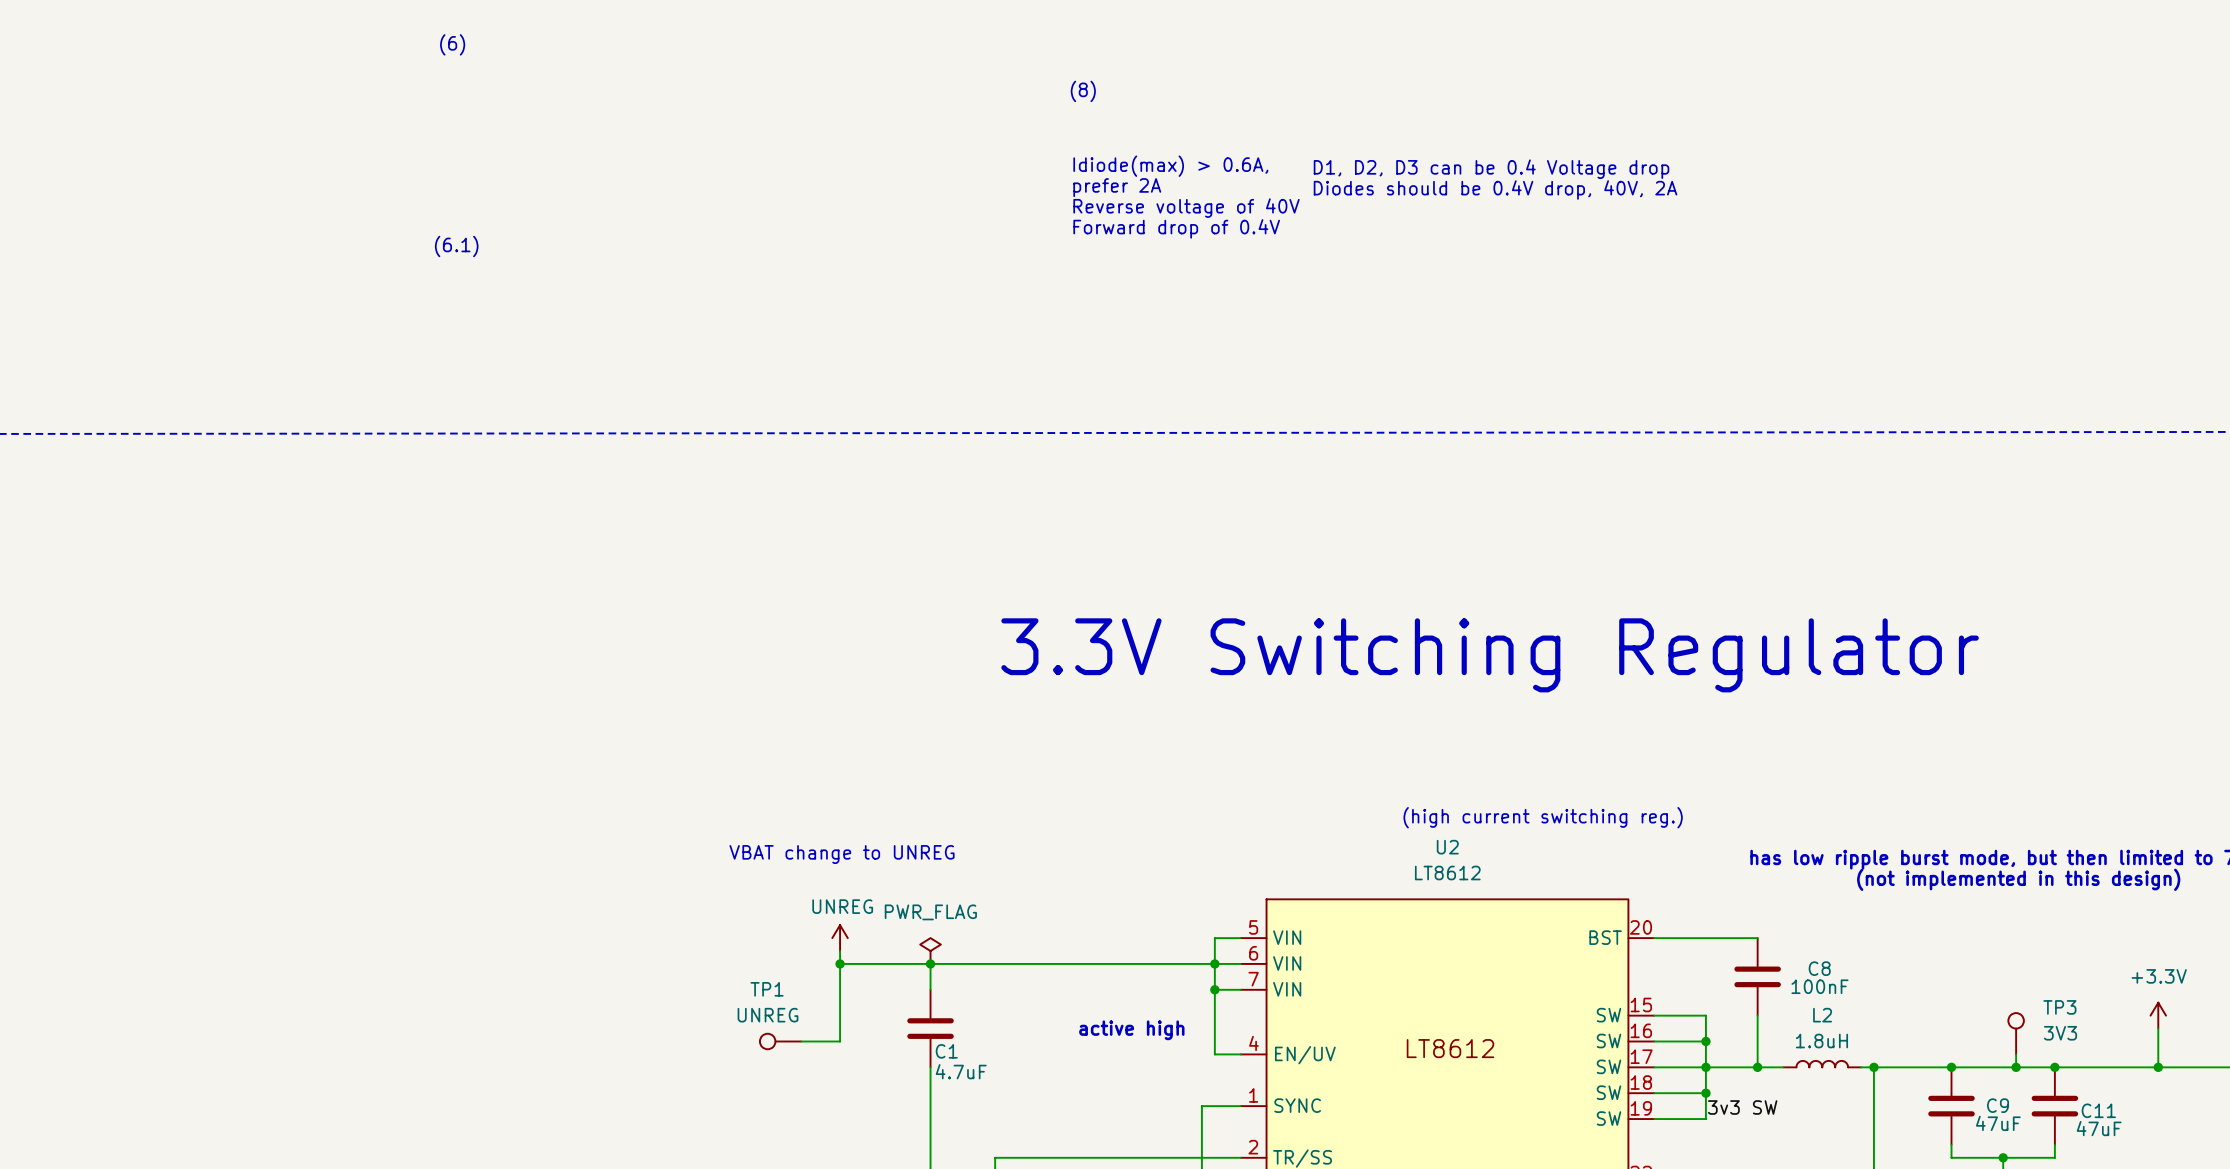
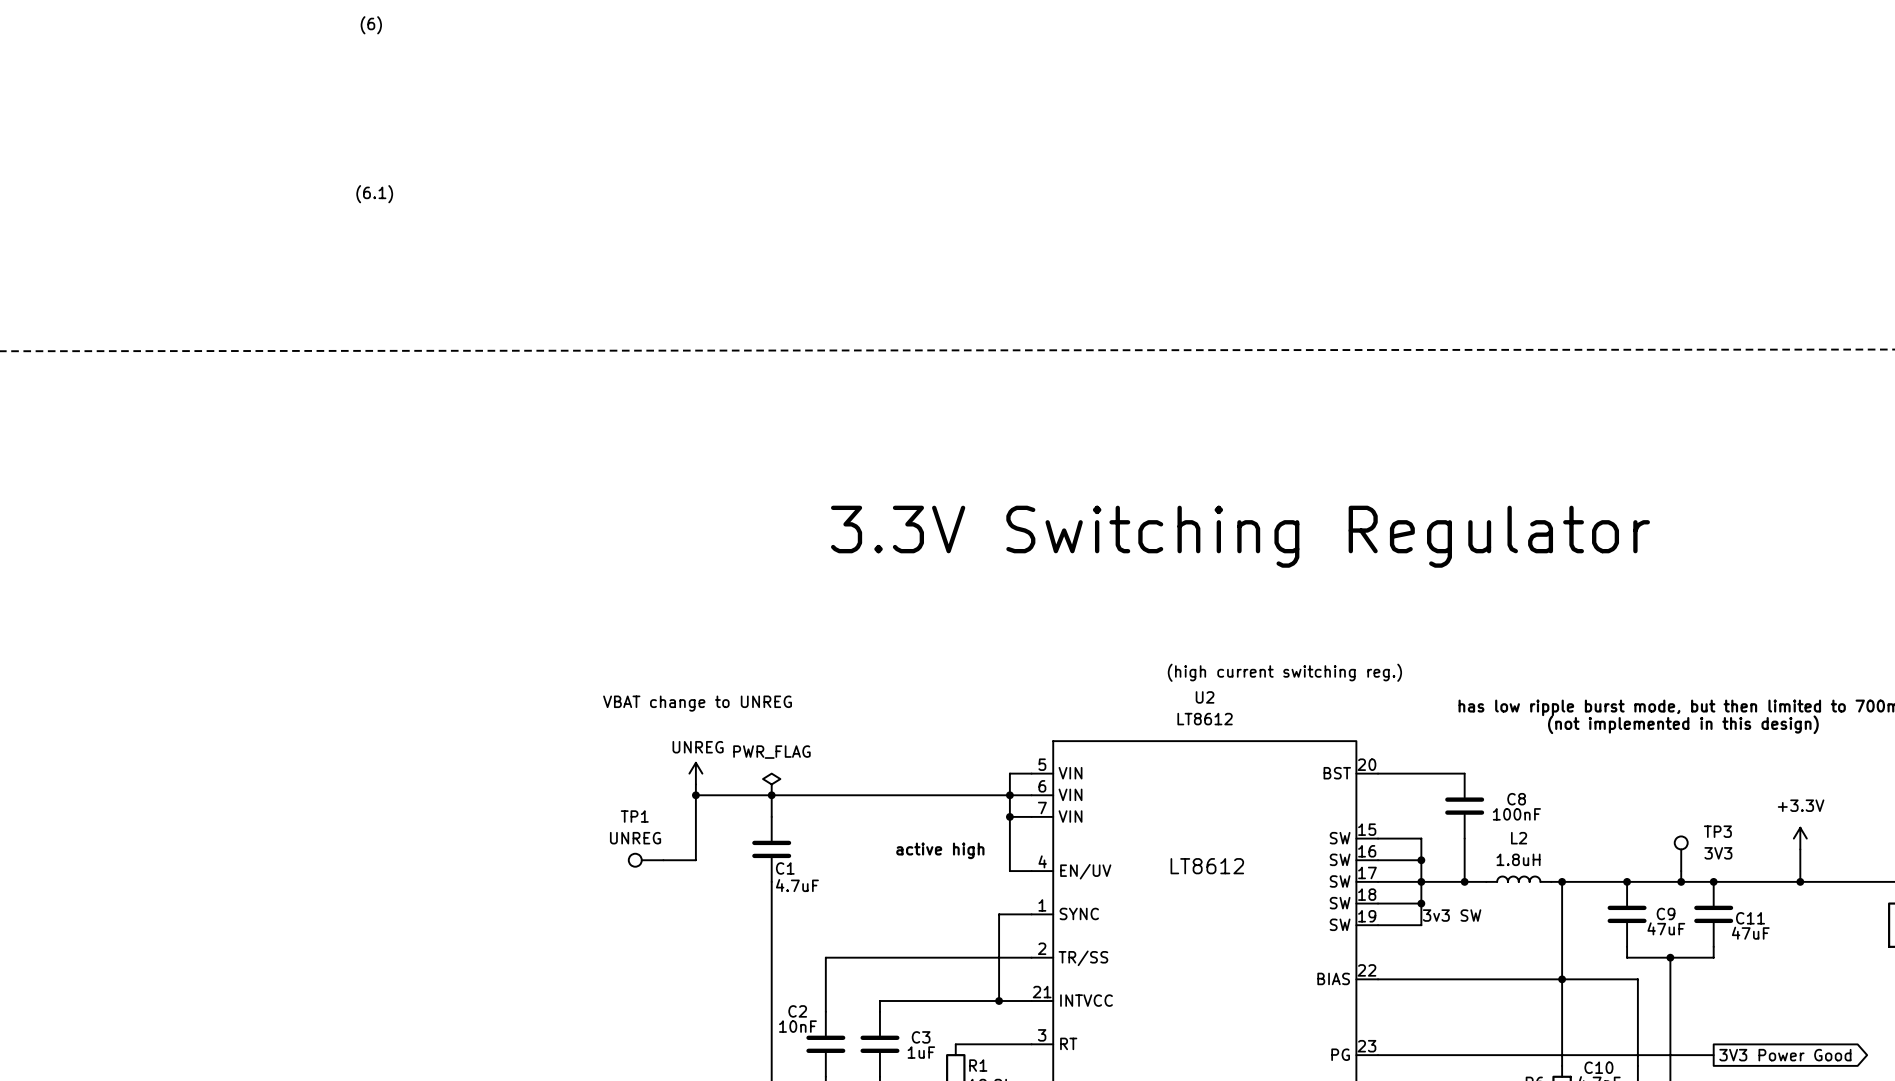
text: (8) (1083, 91) -> none
text: Idiode(max) > 0.6A, (1170, 166) -> none
text: D1, D2, D3 can be 0.4 Voltage drop (1491, 169) -> none
text: prefer 2A (1117, 187) -> none
text: Diodes should be 0.4V drop, 40V, 2A (1495, 190) -> none
text: Reverse voltage of 40V (1186, 208) -> none
text: Forward drop of 0.4V (1176, 228) -> none

